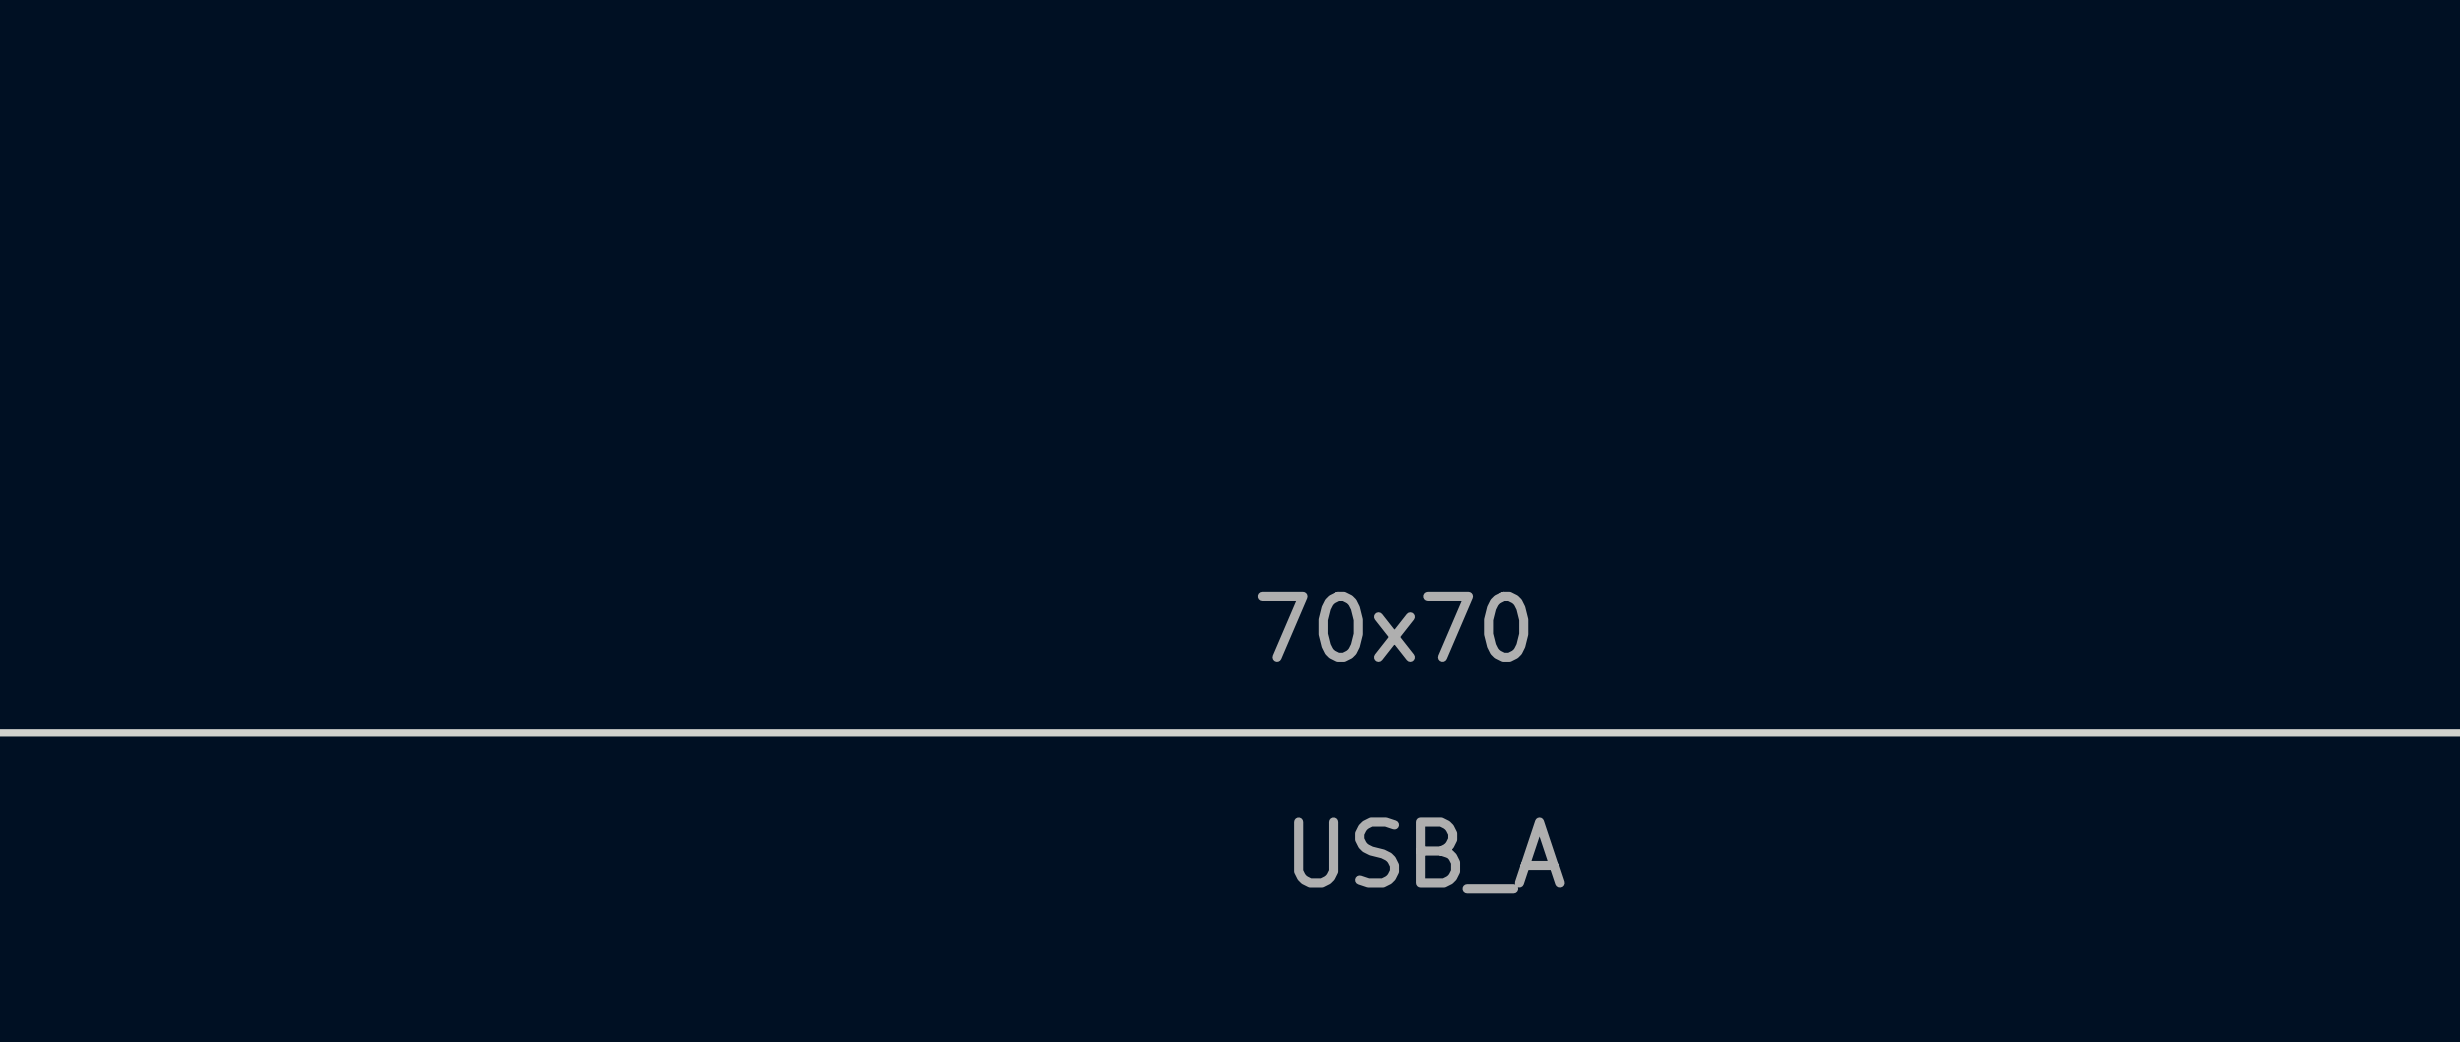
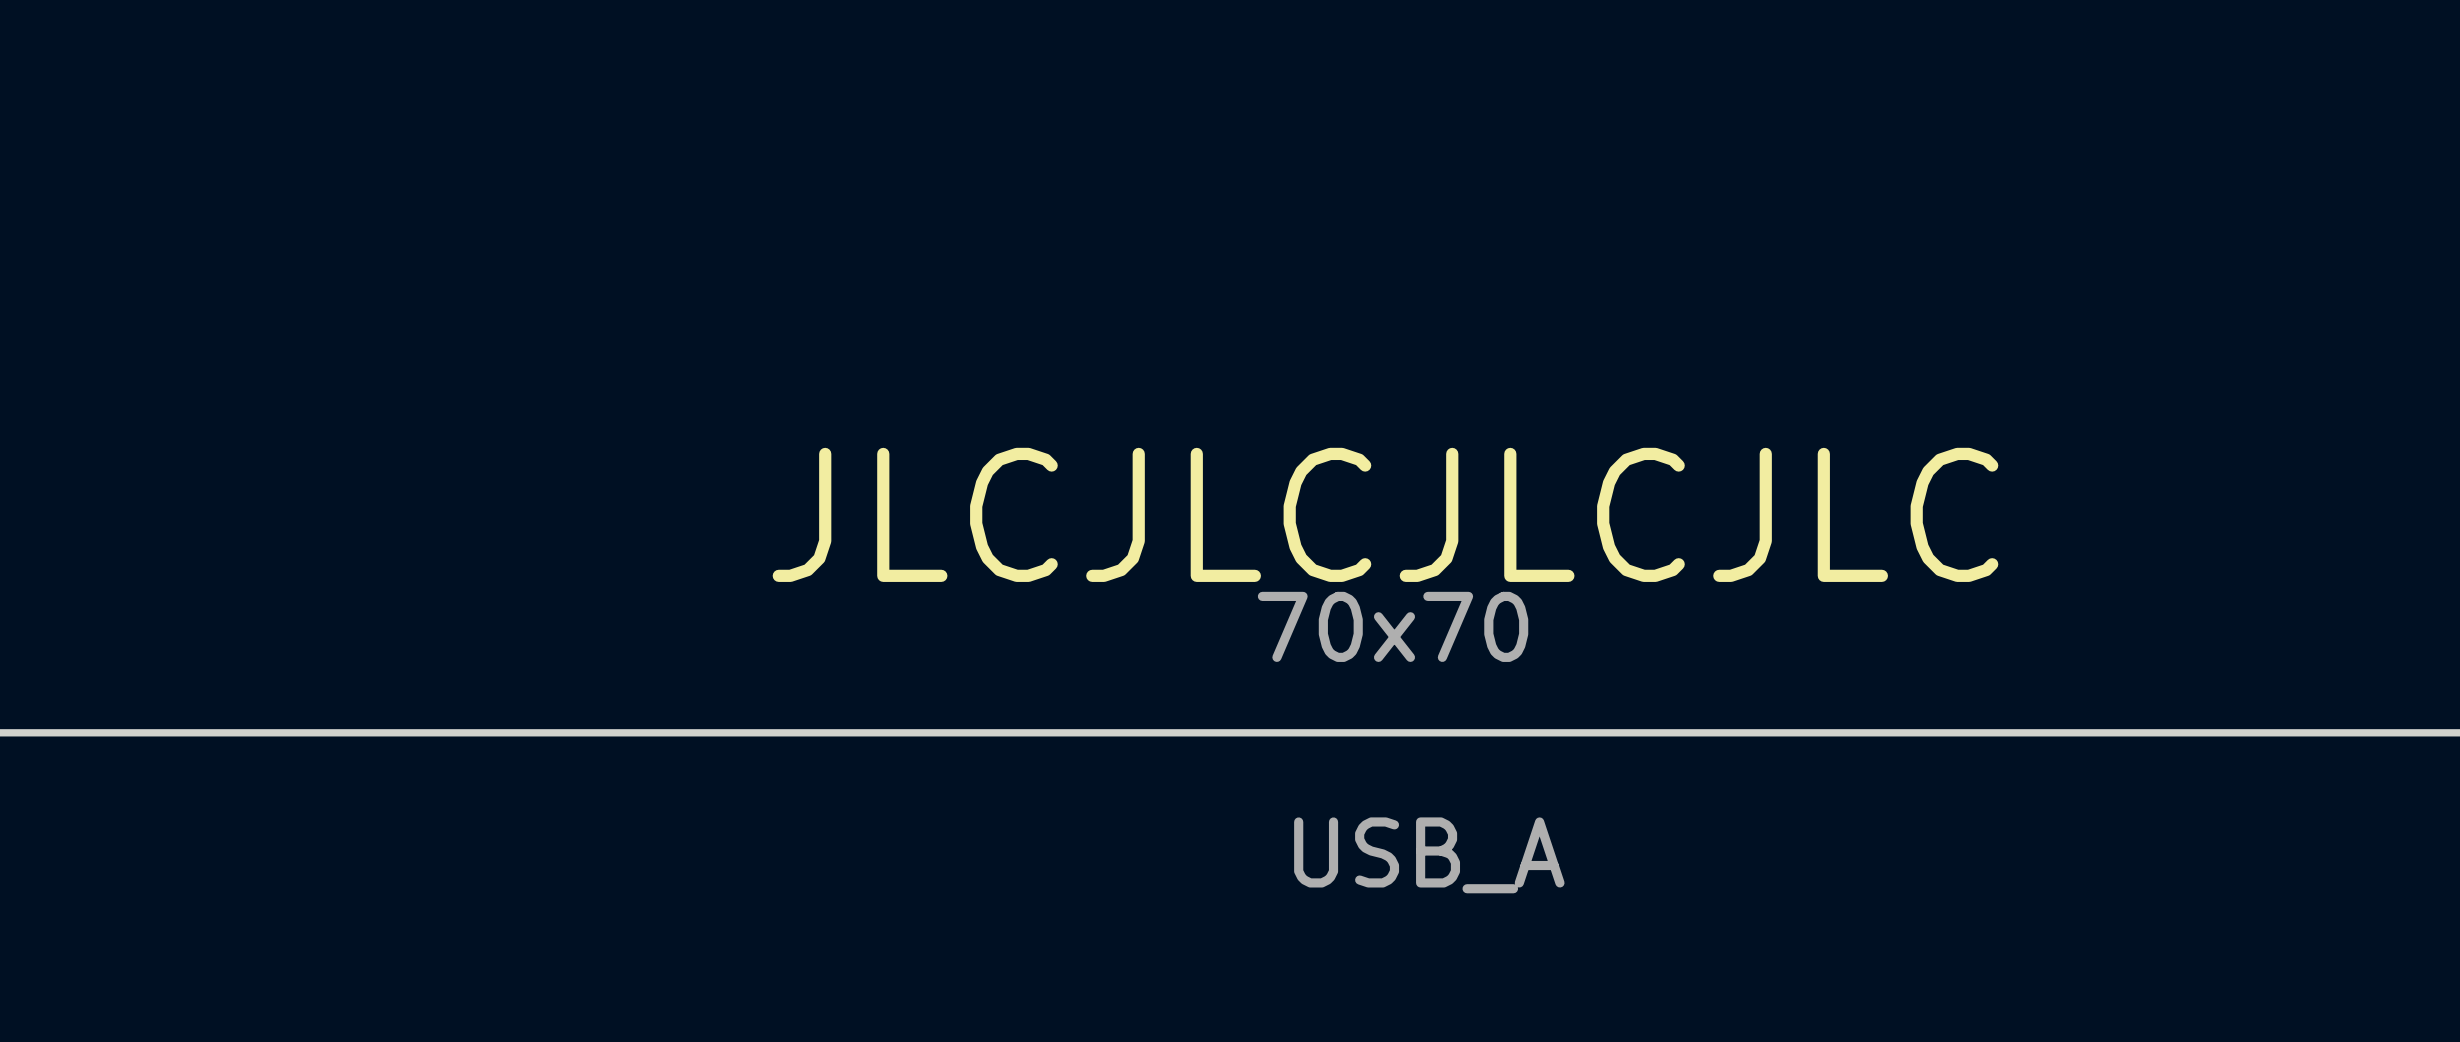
part text: none -> JLCJLCJLCJLC (1385, 514)

